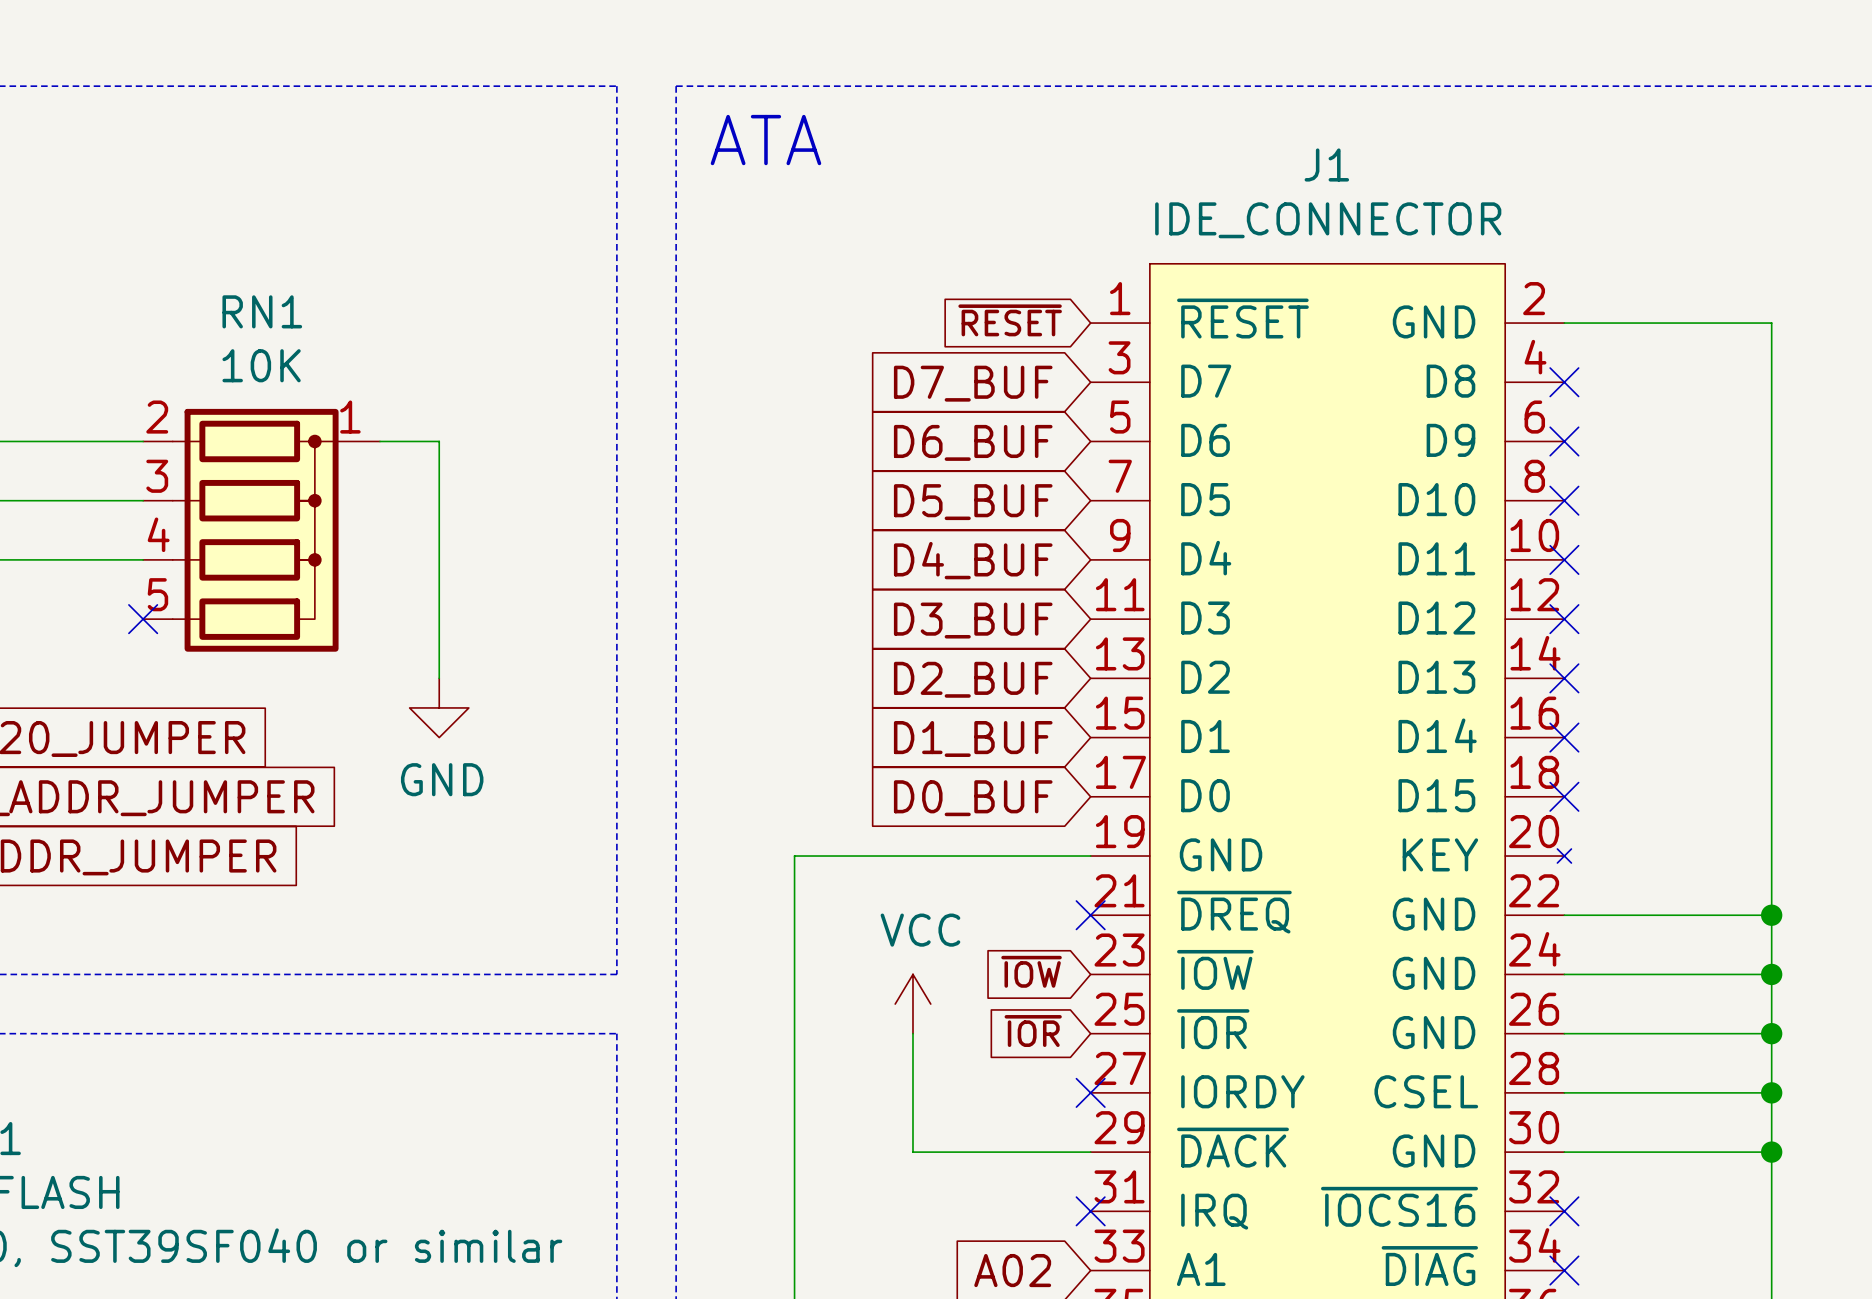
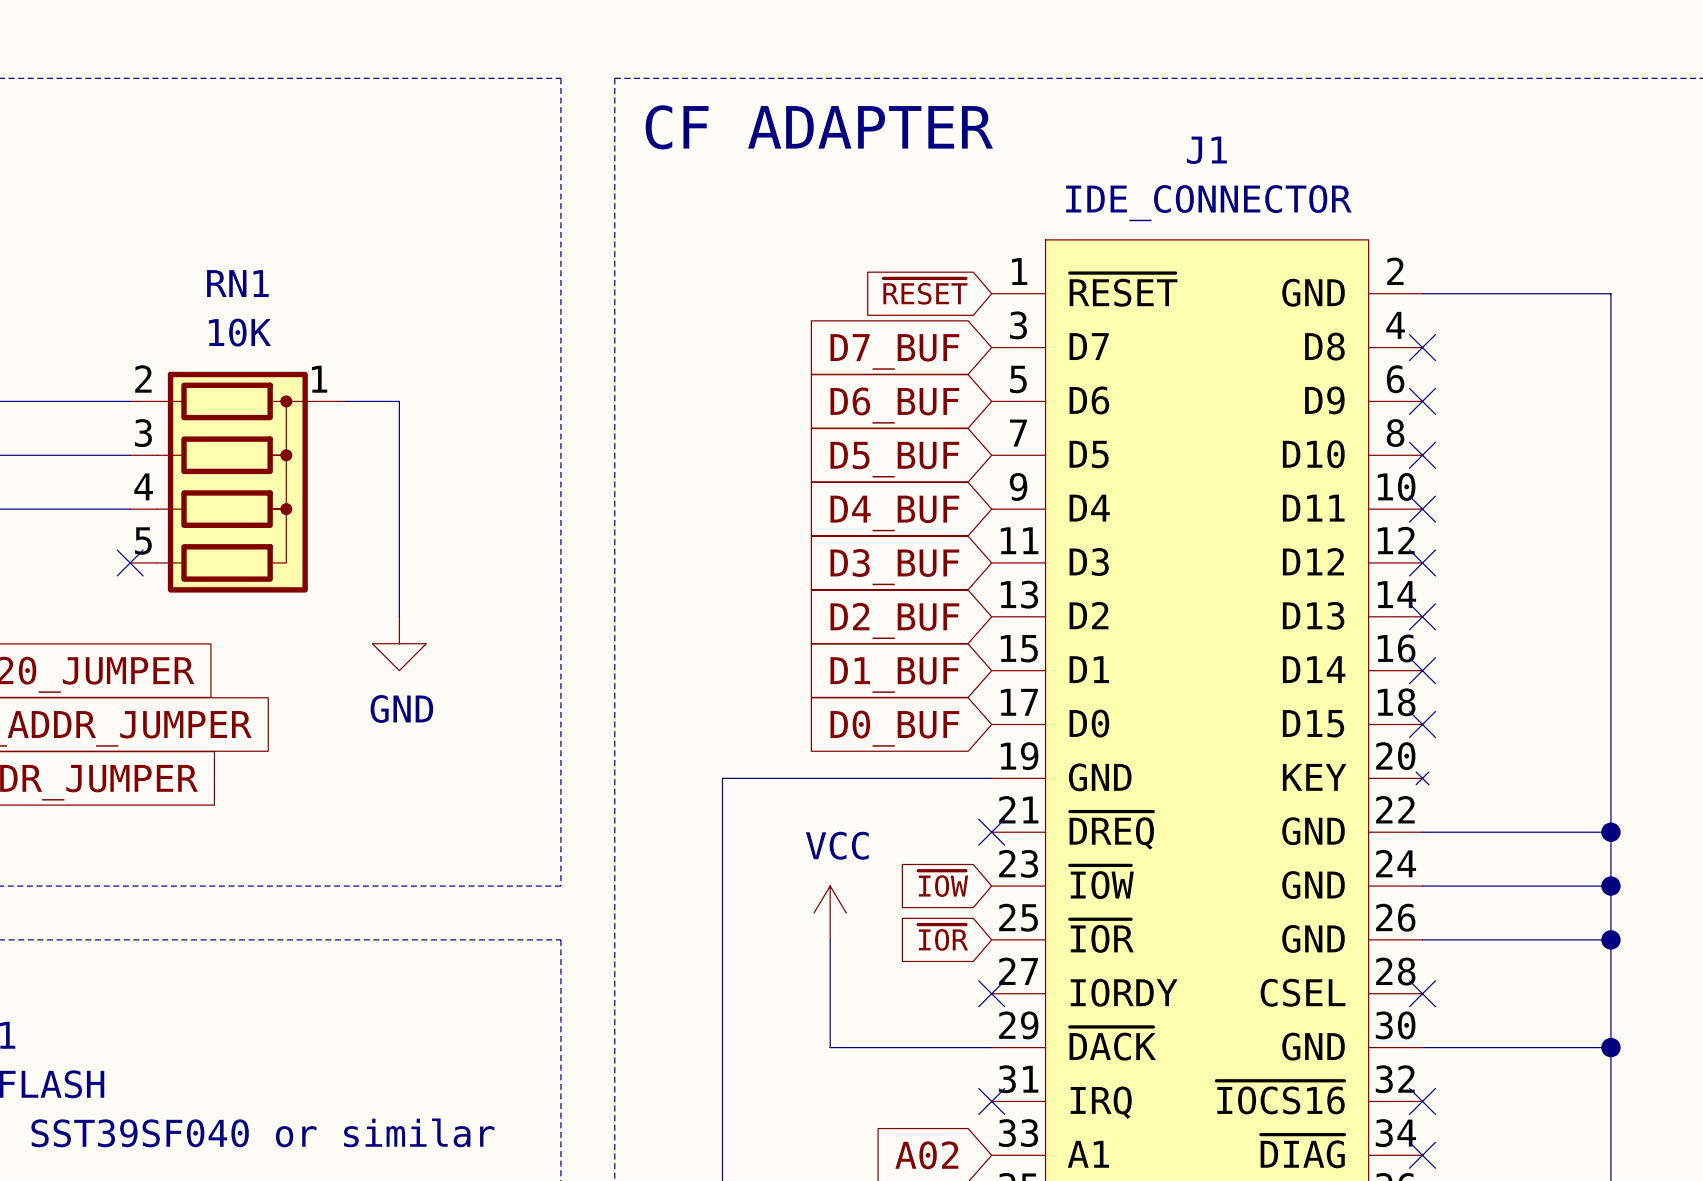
text: ATA (765, 140) -> CF ADAPTER (819, 127)
wire: (1564, 1092) (1771, 1092) -> none
no-connect mark: none -> (1422, 993)
junction: (1771, 1092) -> none

